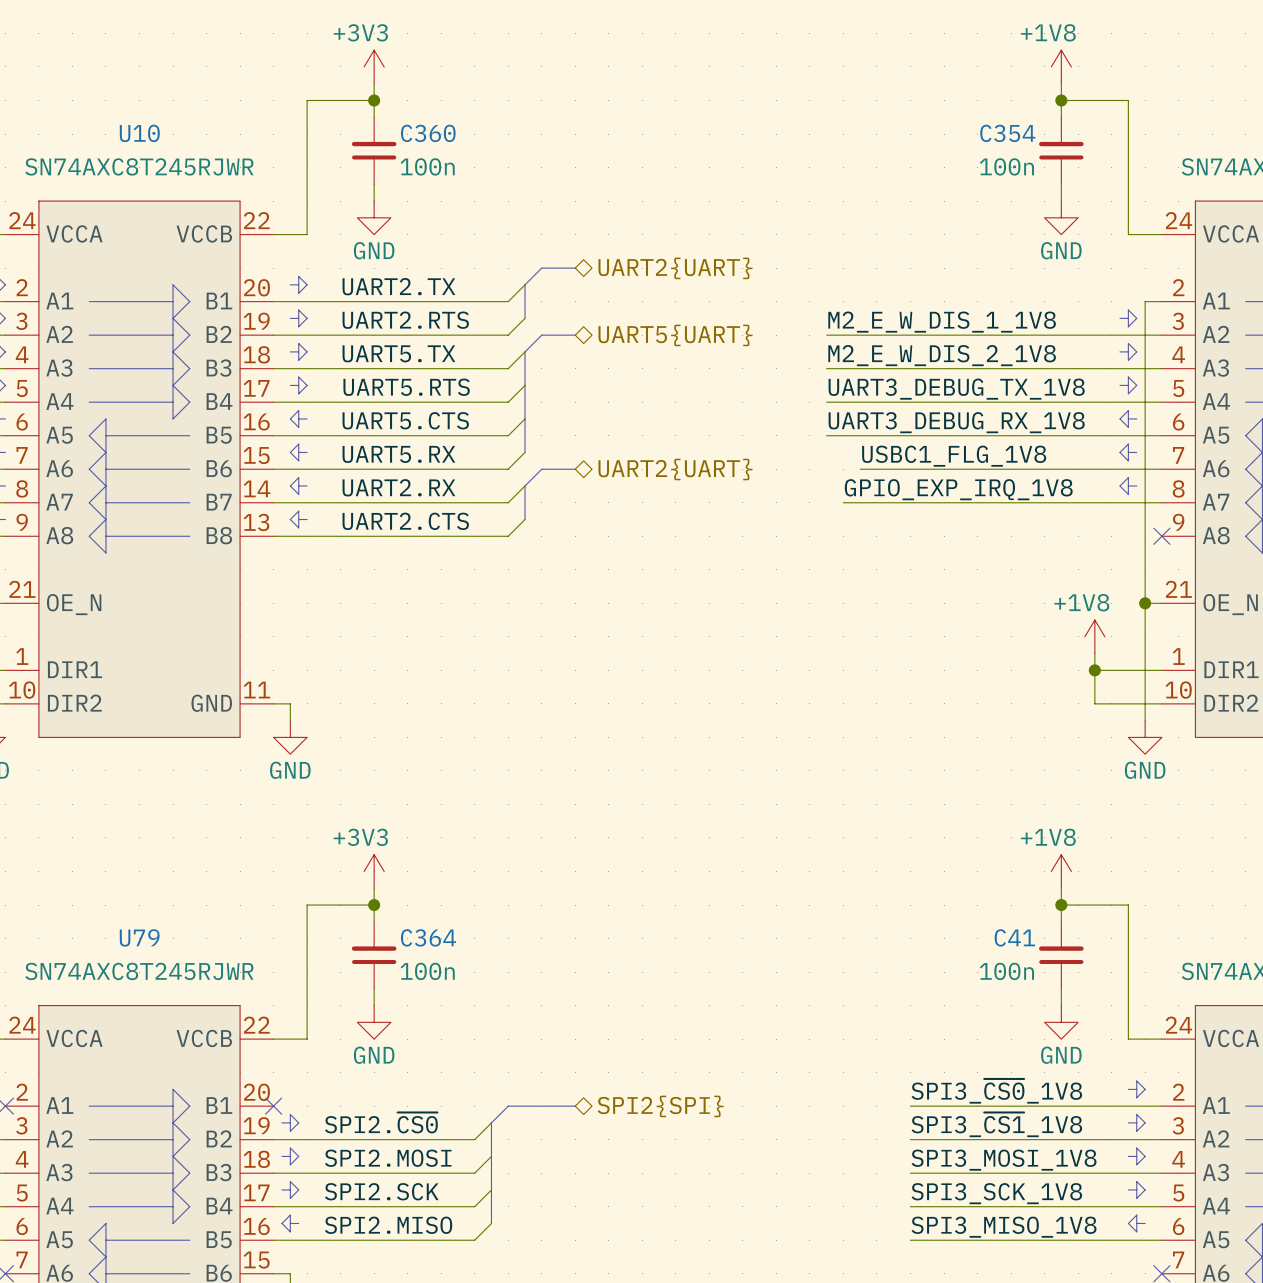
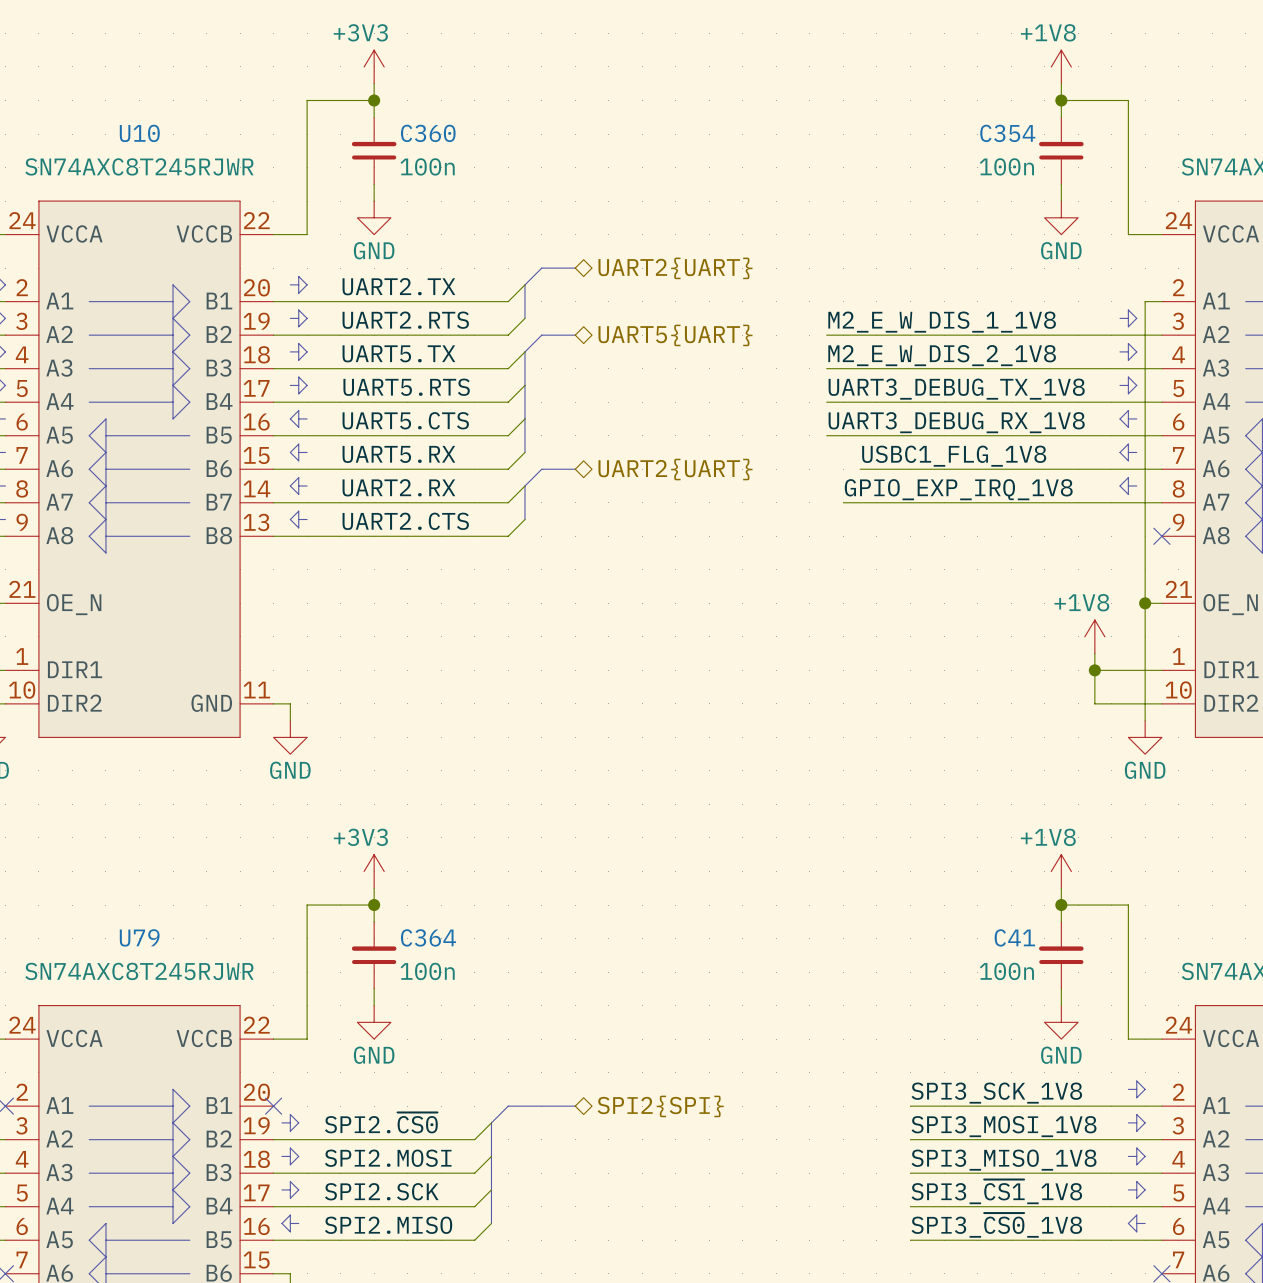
label: SPI3_~{CS0}_1V8 (996, 1091) -> SPI3_SCK_1V8 (996, 1093)
label: SPI3_~{CS1}_1V8 (996, 1124) -> SPI3_MOSI_1V8 (1004, 1126)
label: SPI3_MOSI_1V8 (1004, 1160) -> SPI3_MISO_1V8 (1004, 1160)
label: SPI3_SCK_1V8 (996, 1193) -> SPI3_~{CS1}_1V8 (996, 1191)
label: SPI3_MISO_1V8 (1004, 1227) -> SPI3_~{CS0}_1V8 (996, 1225)

